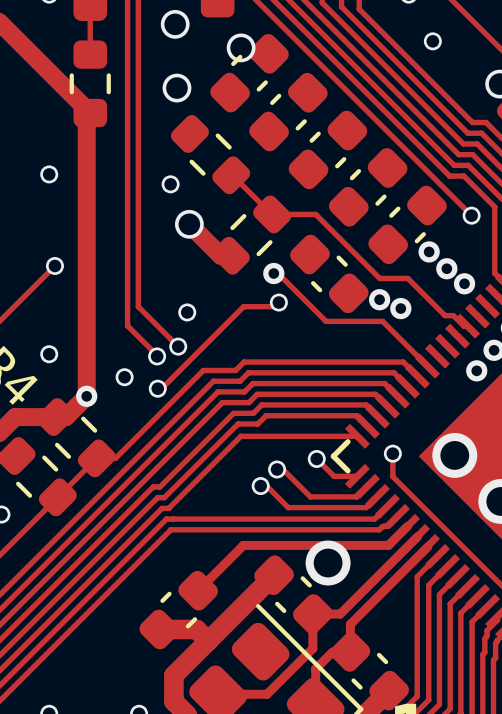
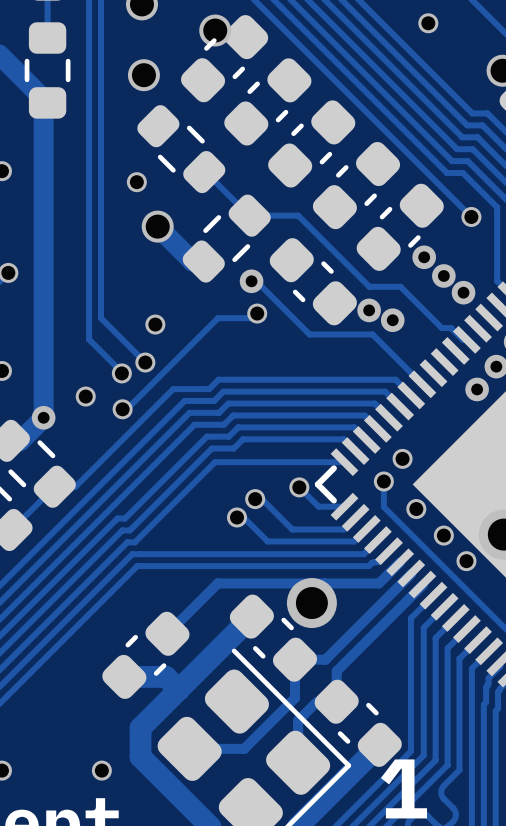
via: none -> (402, 458)
via: (454, 455) -> none
via: none -> (416, 509)
via: none -> (443, 535)
via: none -> (466, 561)

